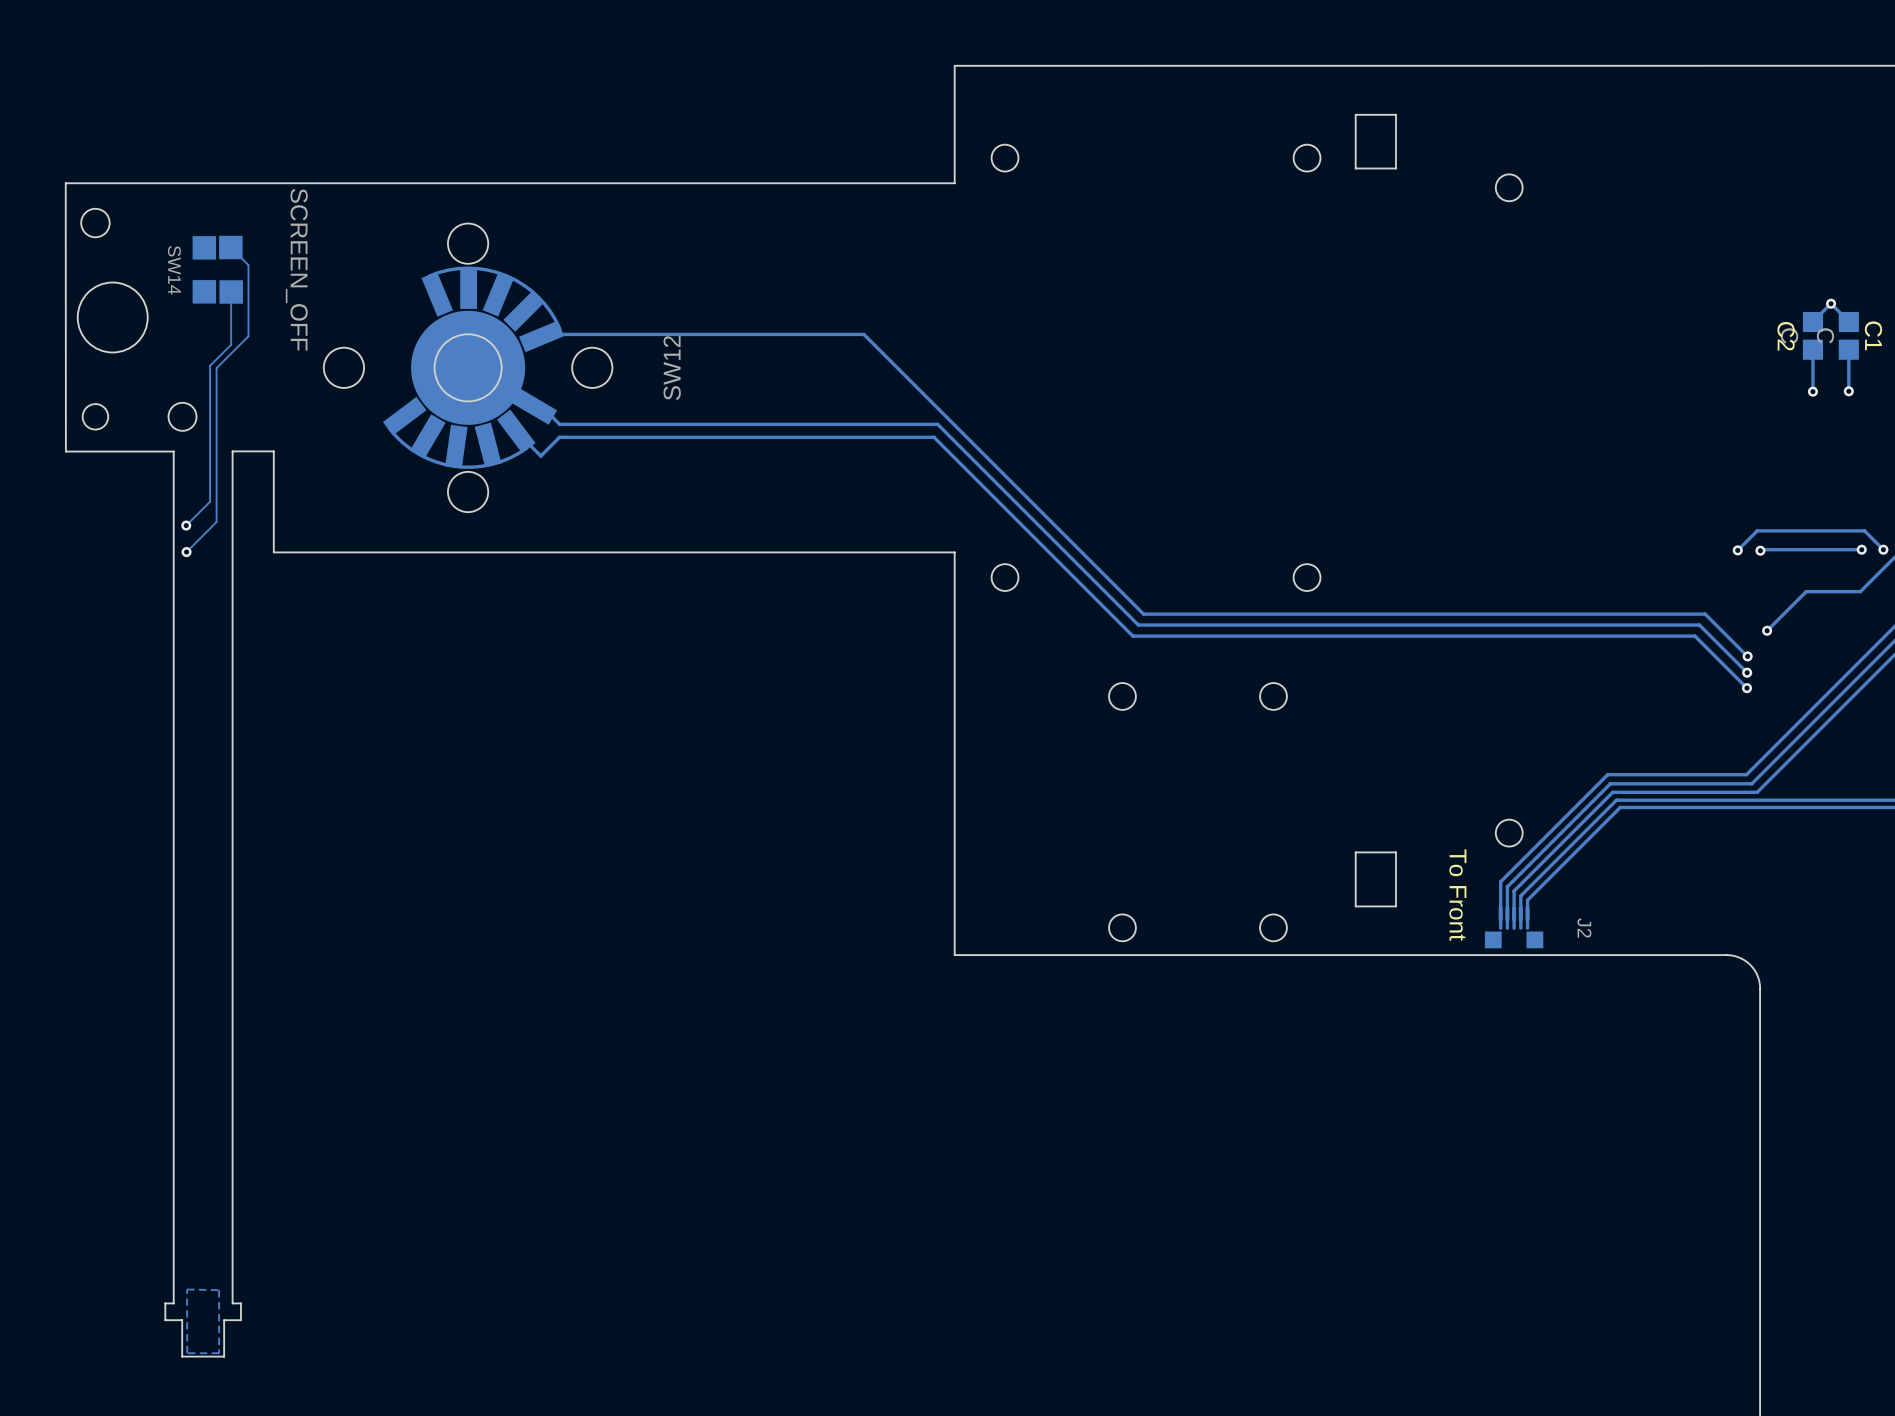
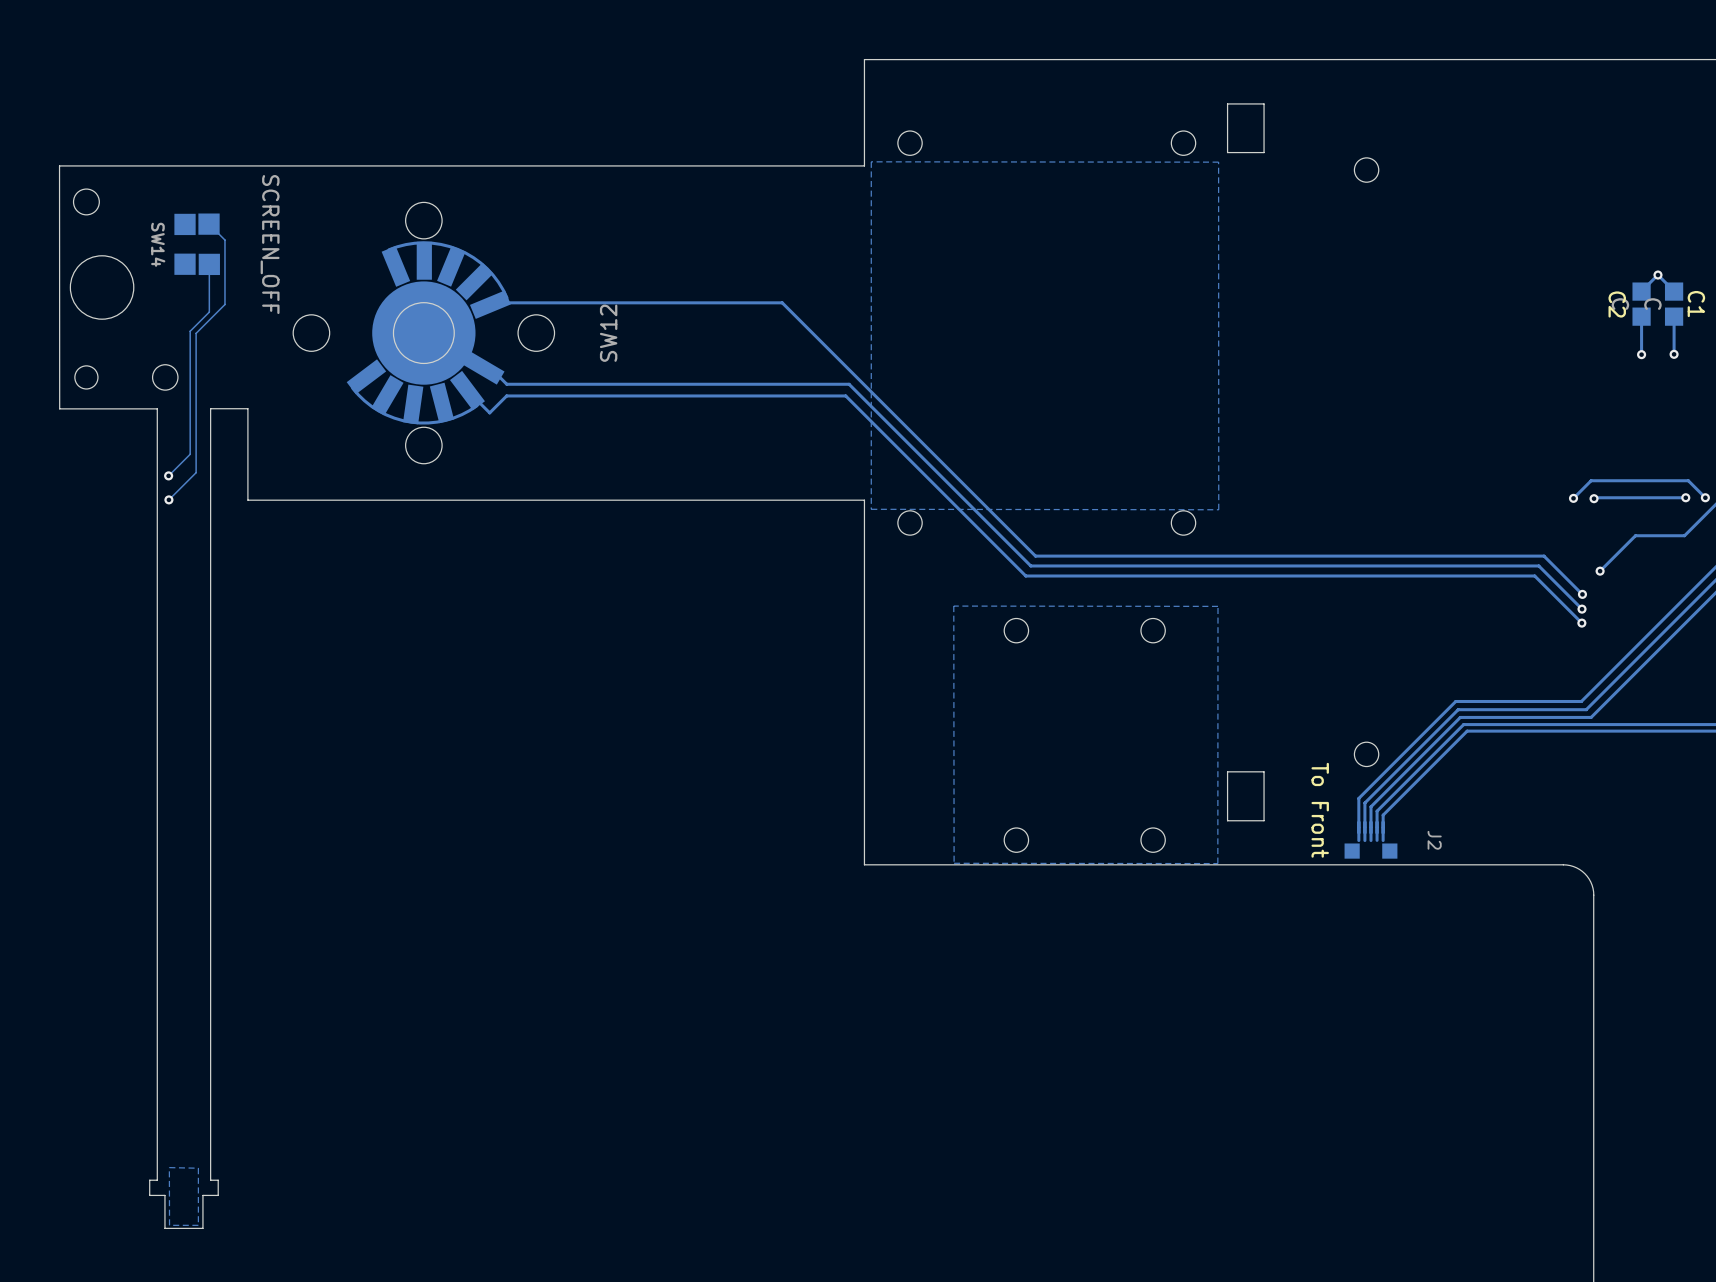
zone outline: none -> (871, 161) (871, 509) (1218, 509) (1218, 162) (871, 161)
zone outline: none -> (953, 606) (954, 863) (1217, 863) (1217, 606) (953, 606)

